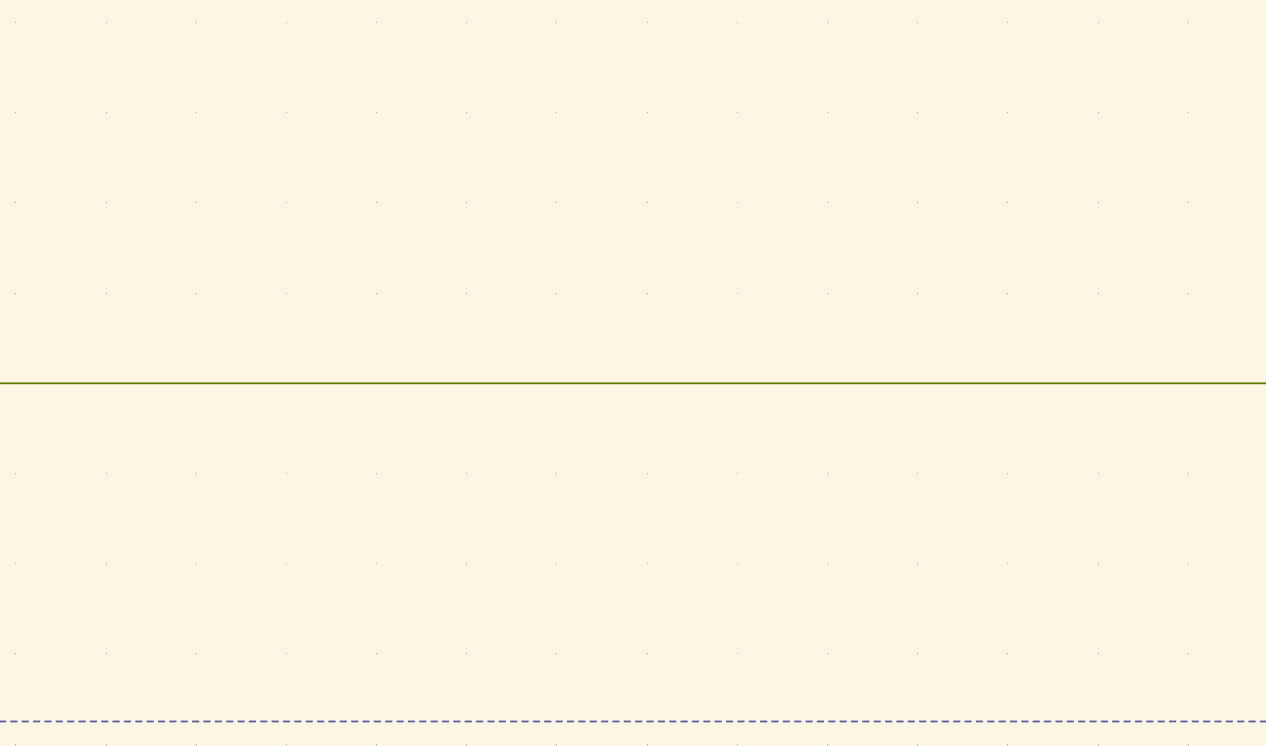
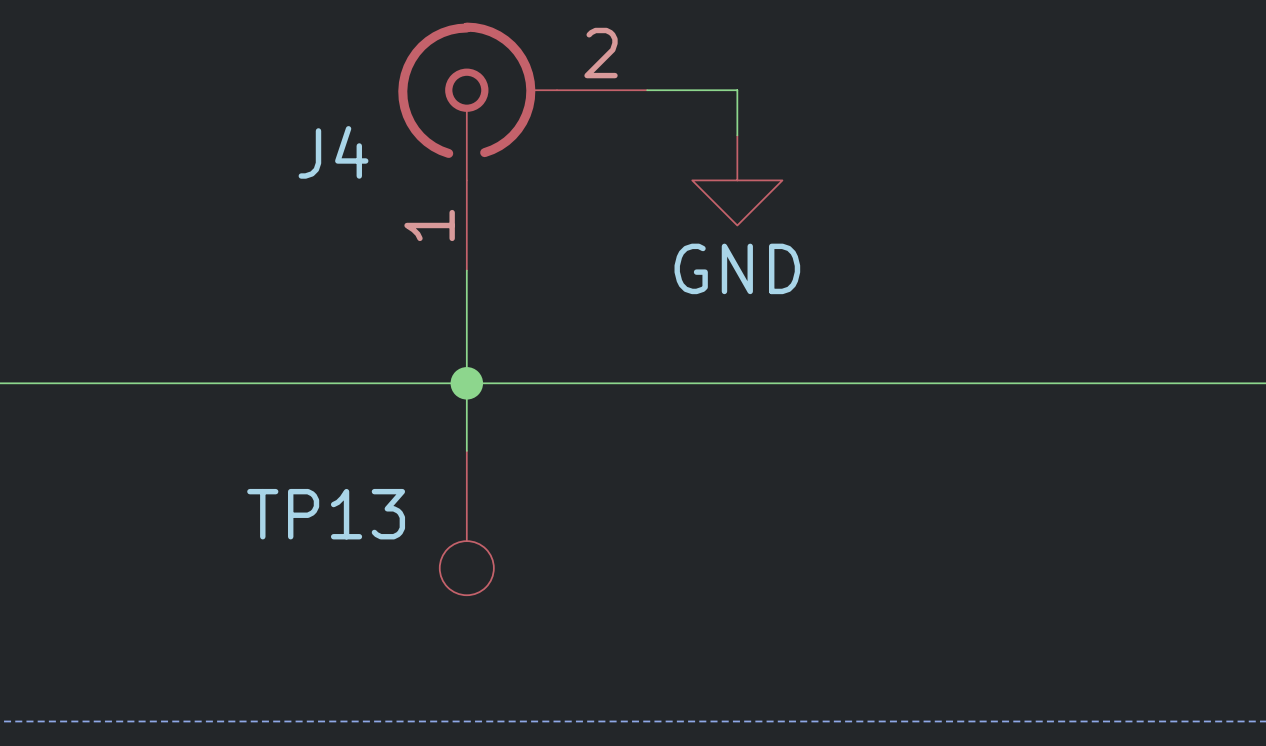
wire: none -> (647, 90) (737, 90) (737, 135)
J4: none -> (522, 146)
power symbol: none -> GND (737, 180)
wire: none -> (466, 270) (466, 450)
junction: none -> (466, 383)
TP13: none -> (466, 523)

